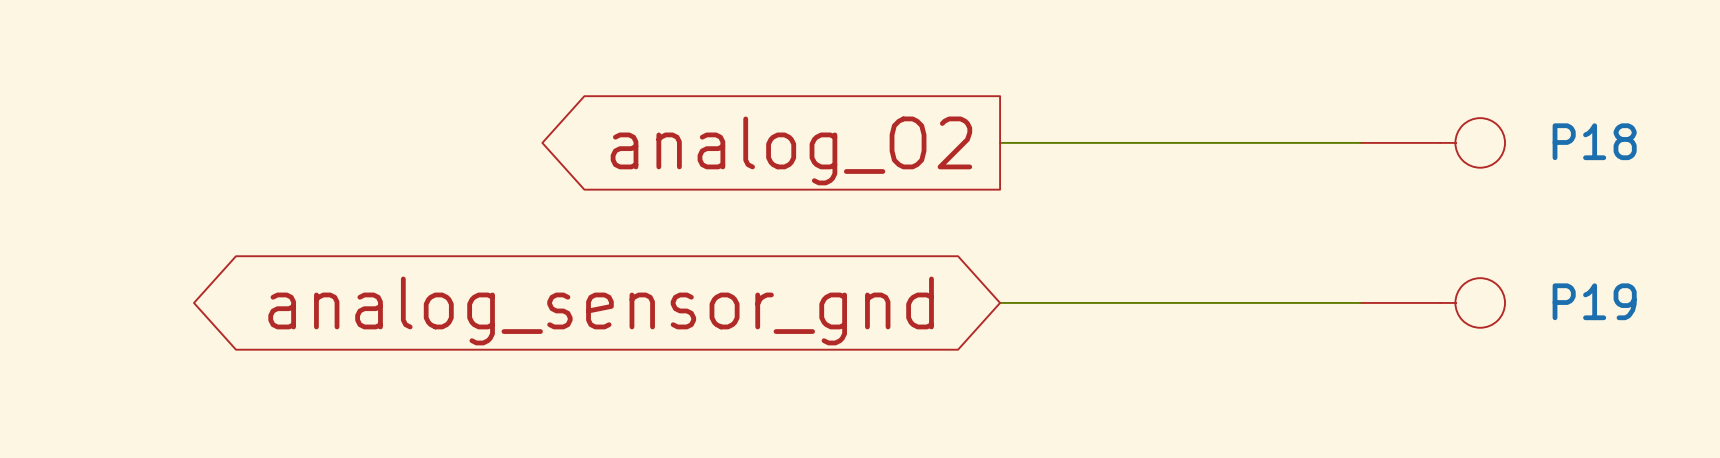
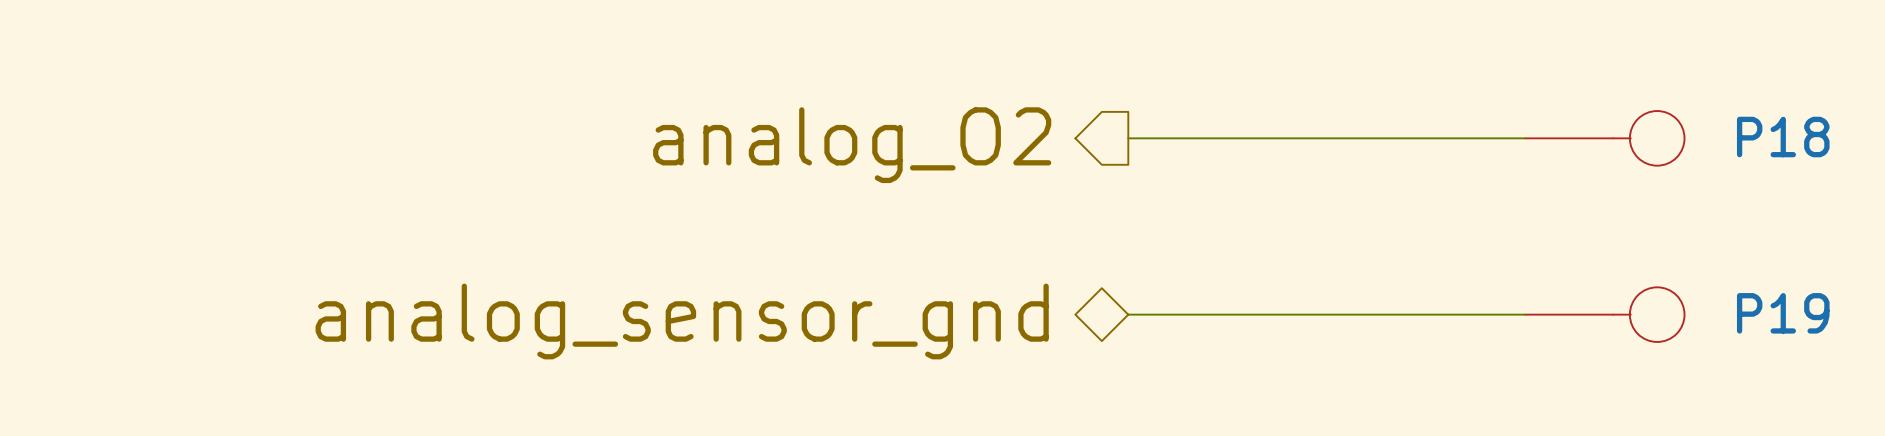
hierarchical label: none -> analog_O2 (852, 145)
global label: analog_O2 (791, 150) -> none
hierarchical label: none -> analog_sensor_gnd (682, 321)
global label: analog_sensor_gnd (601, 310) -> none

